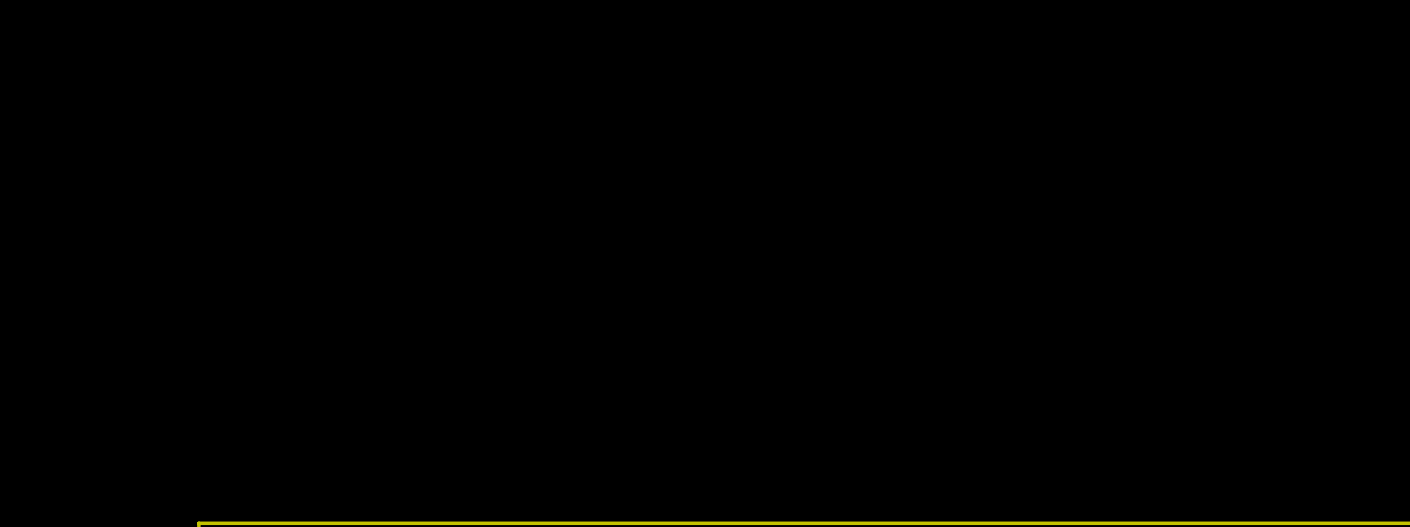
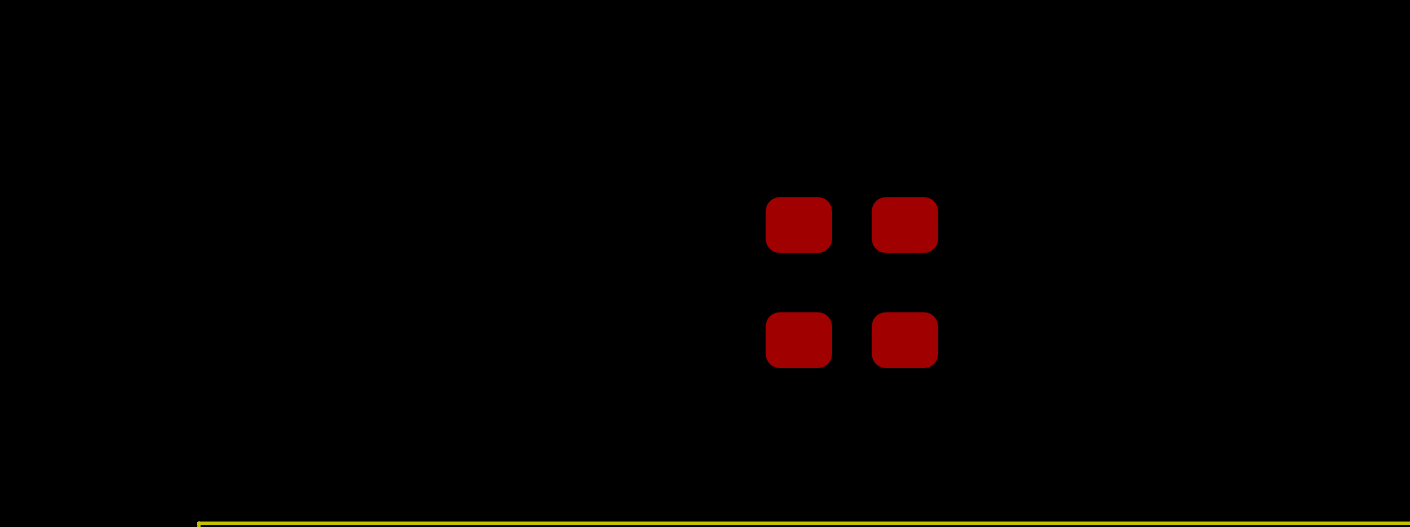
part: none -> (798, 282)
part: none -> (904, 282)

